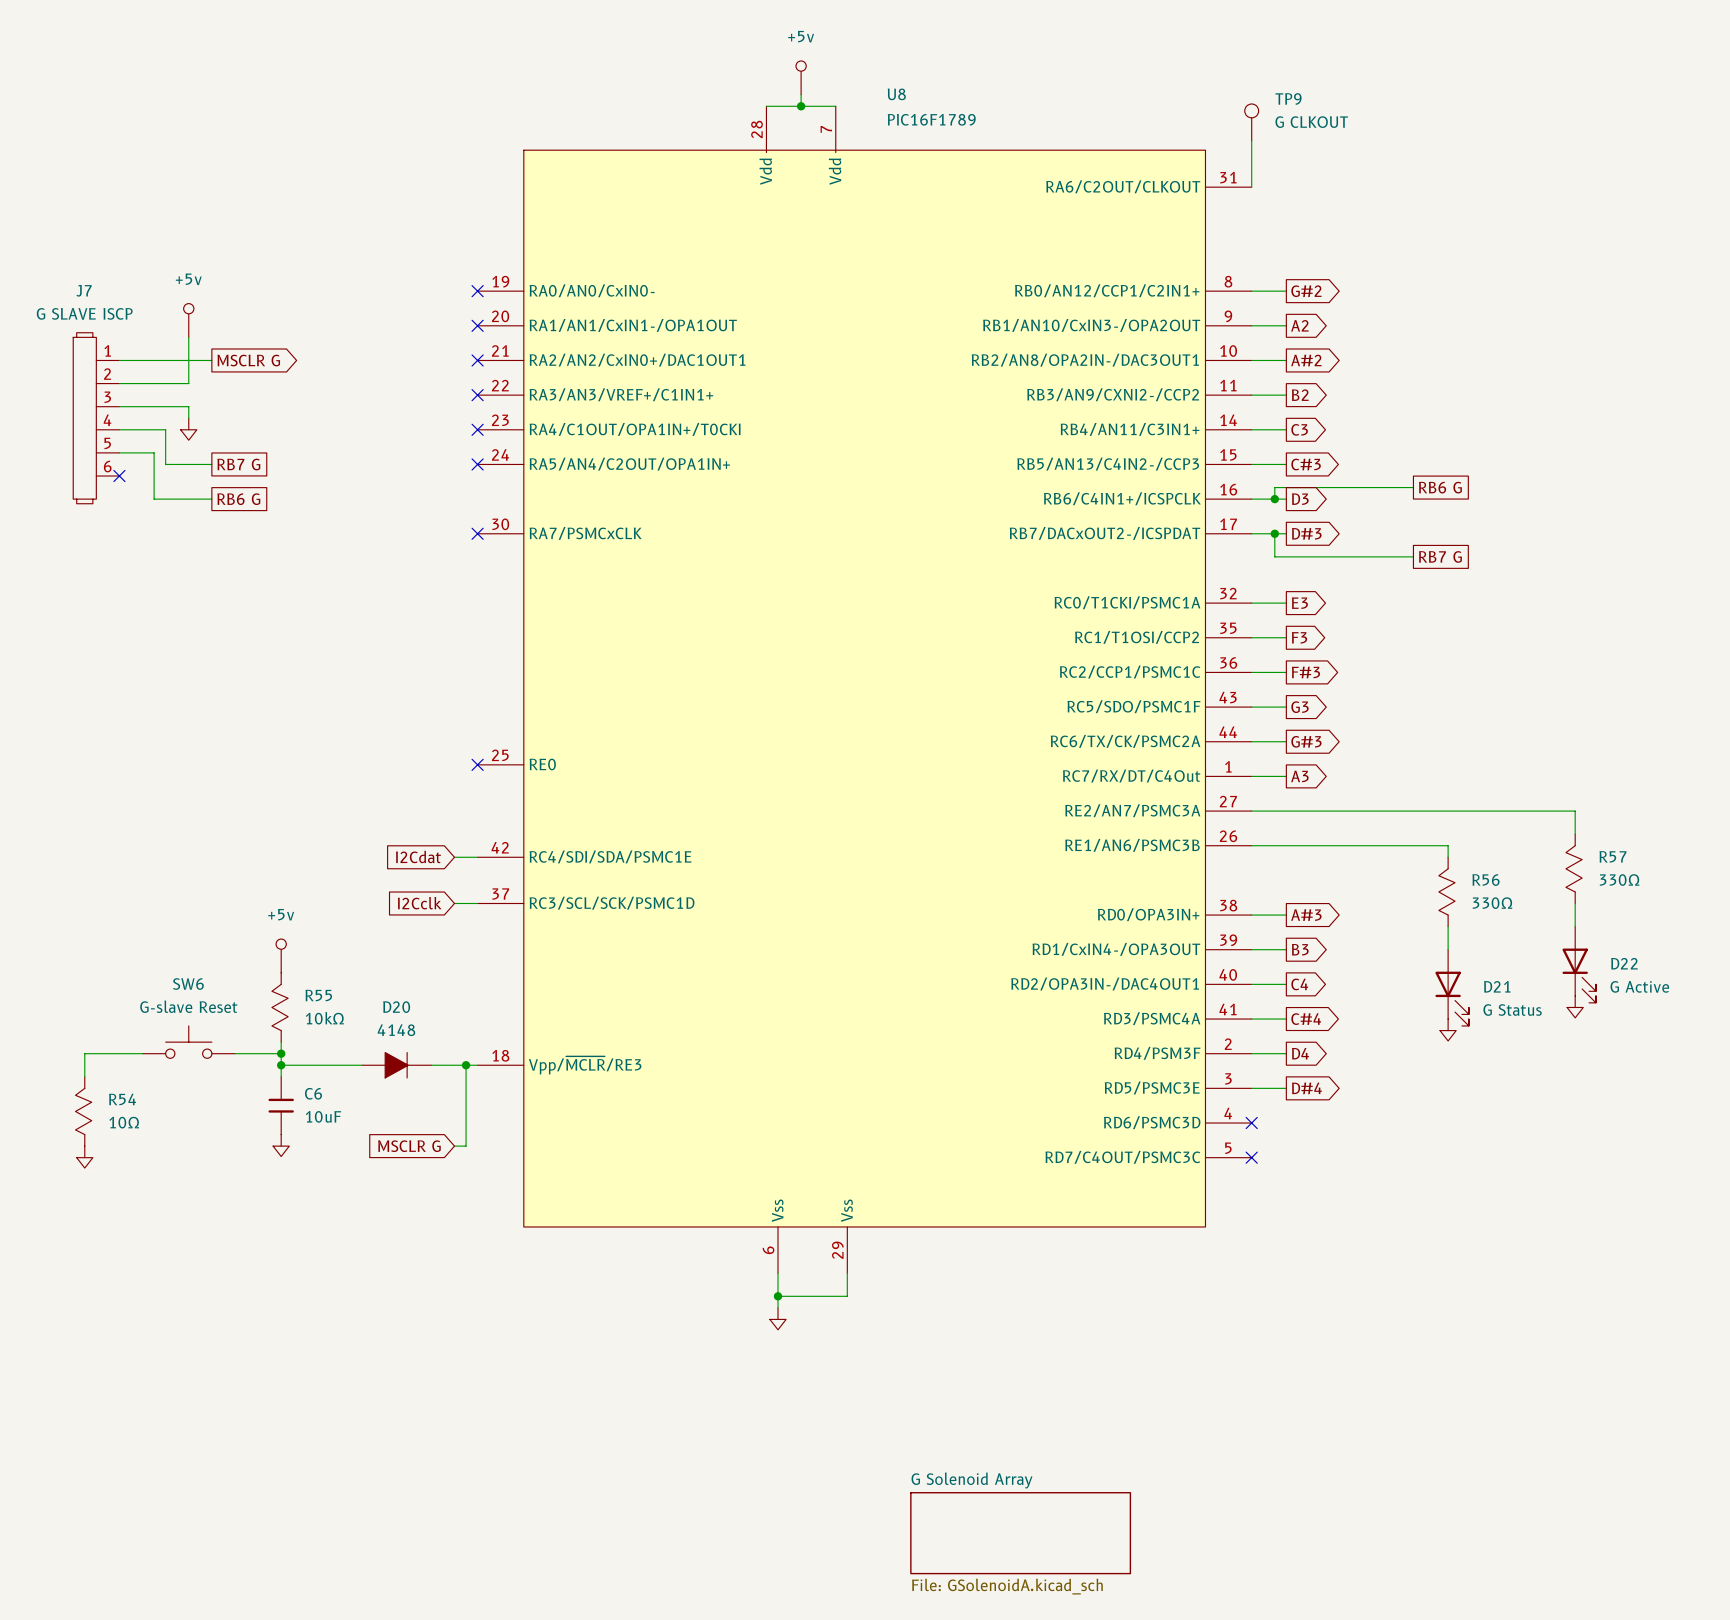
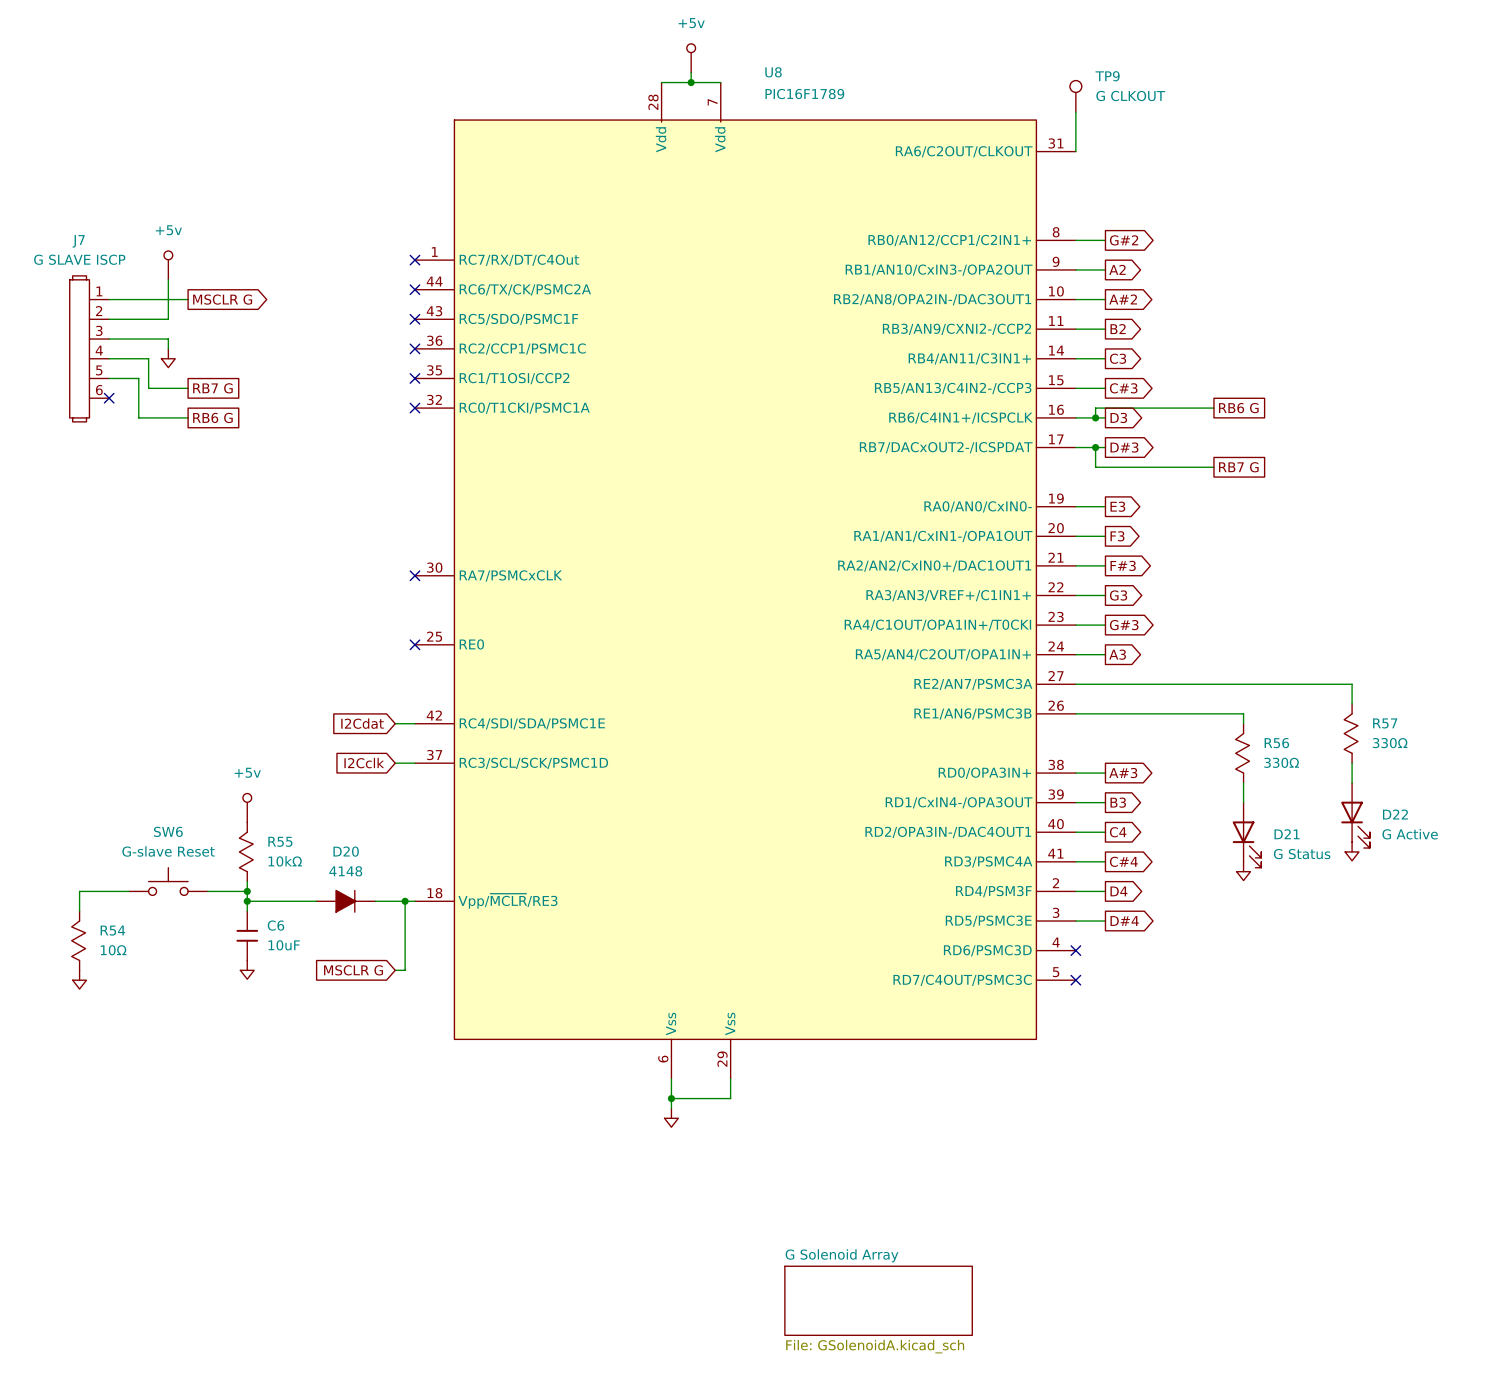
U8 symbol: [477, 106, 1252, 1274] -> [414, 82, 1076, 1079]
no-connect mark: (477, 291) -> none
no-connect mark: none -> (414, 260)
no-connect mark: (477, 325) -> none
no-connect mark: none -> (414, 289)
no-connect mark: (477, 360) -> none
no-connect mark: none -> (414, 319)
no-connect mark: (477, 395) -> none
no-connect mark: none -> (414, 348)
no-connect mark: (477, 429) -> none
no-connect mark: none -> (414, 378)
no-connect mark: (477, 464) -> none
no-connect mark: none -> (414, 408)
no-connect mark: (477, 533) -> none
no-connect mark: none -> (414, 575)

